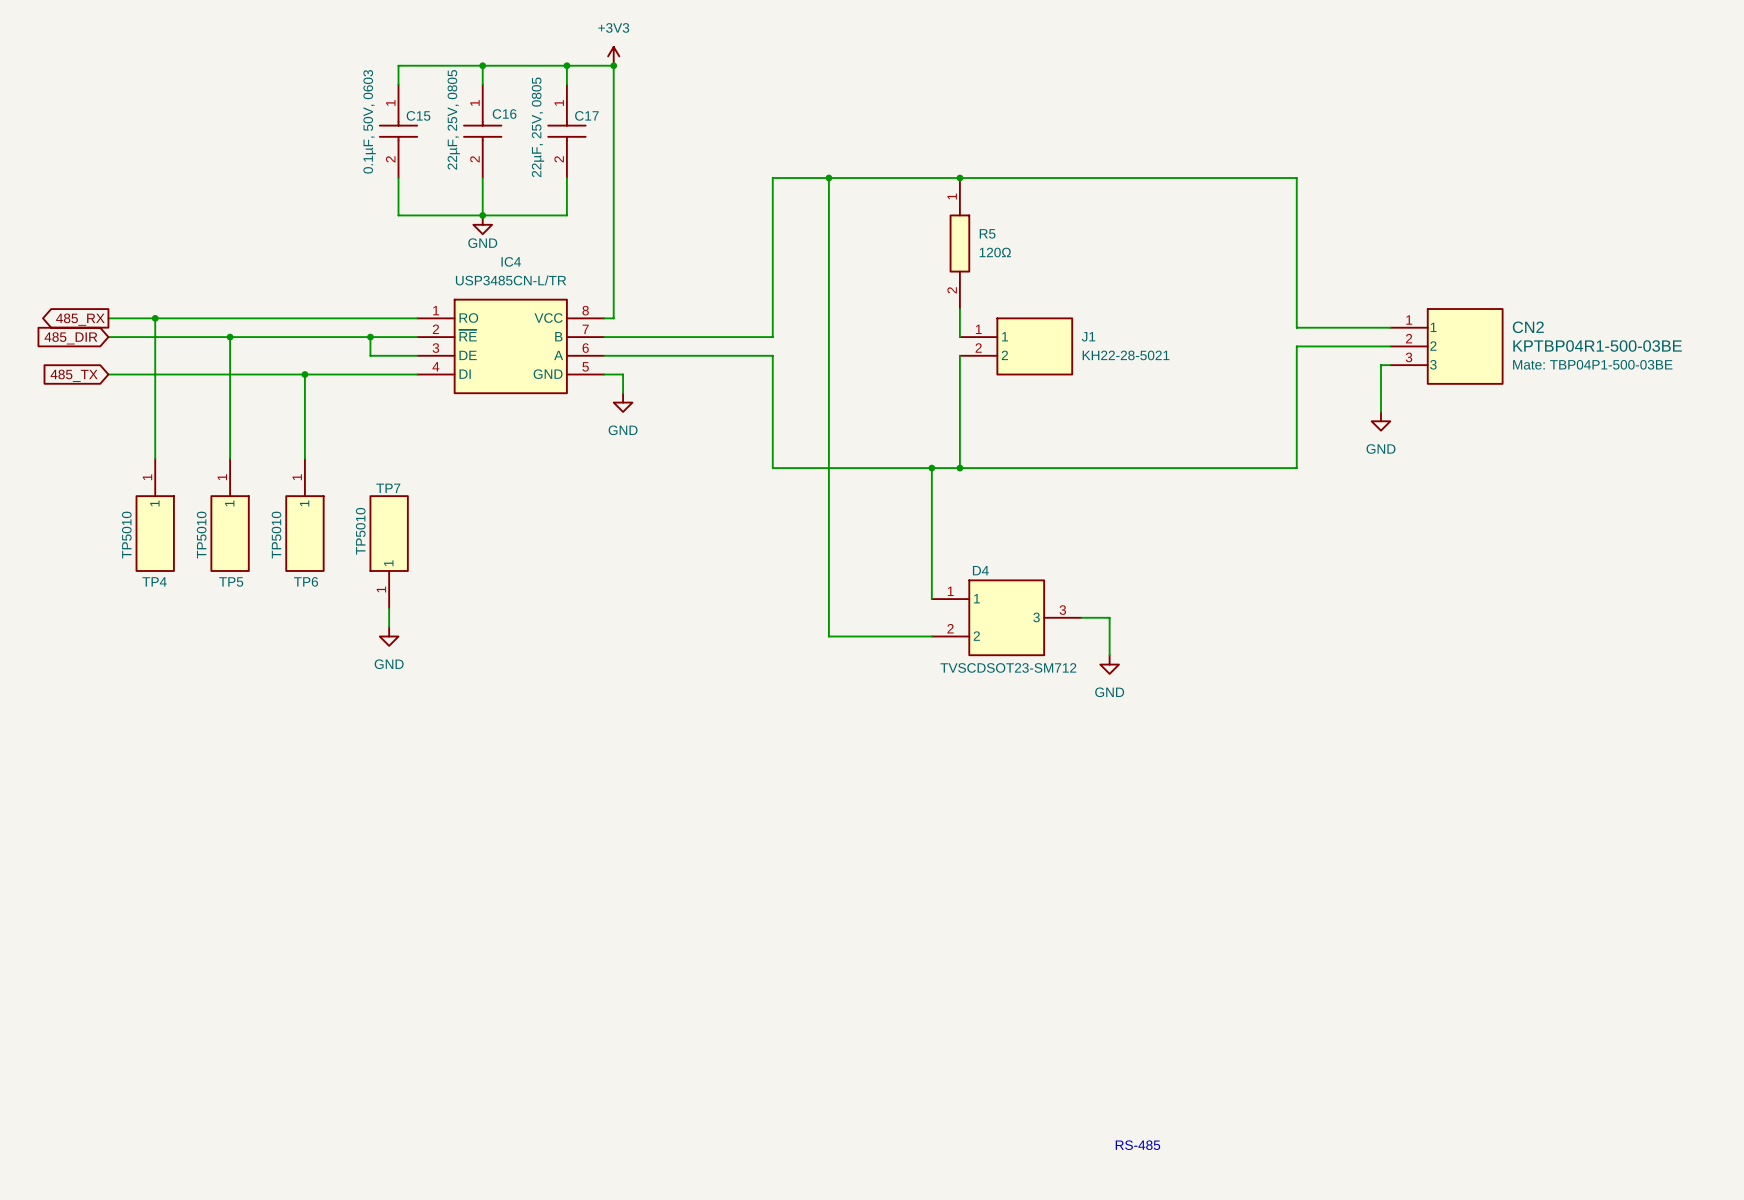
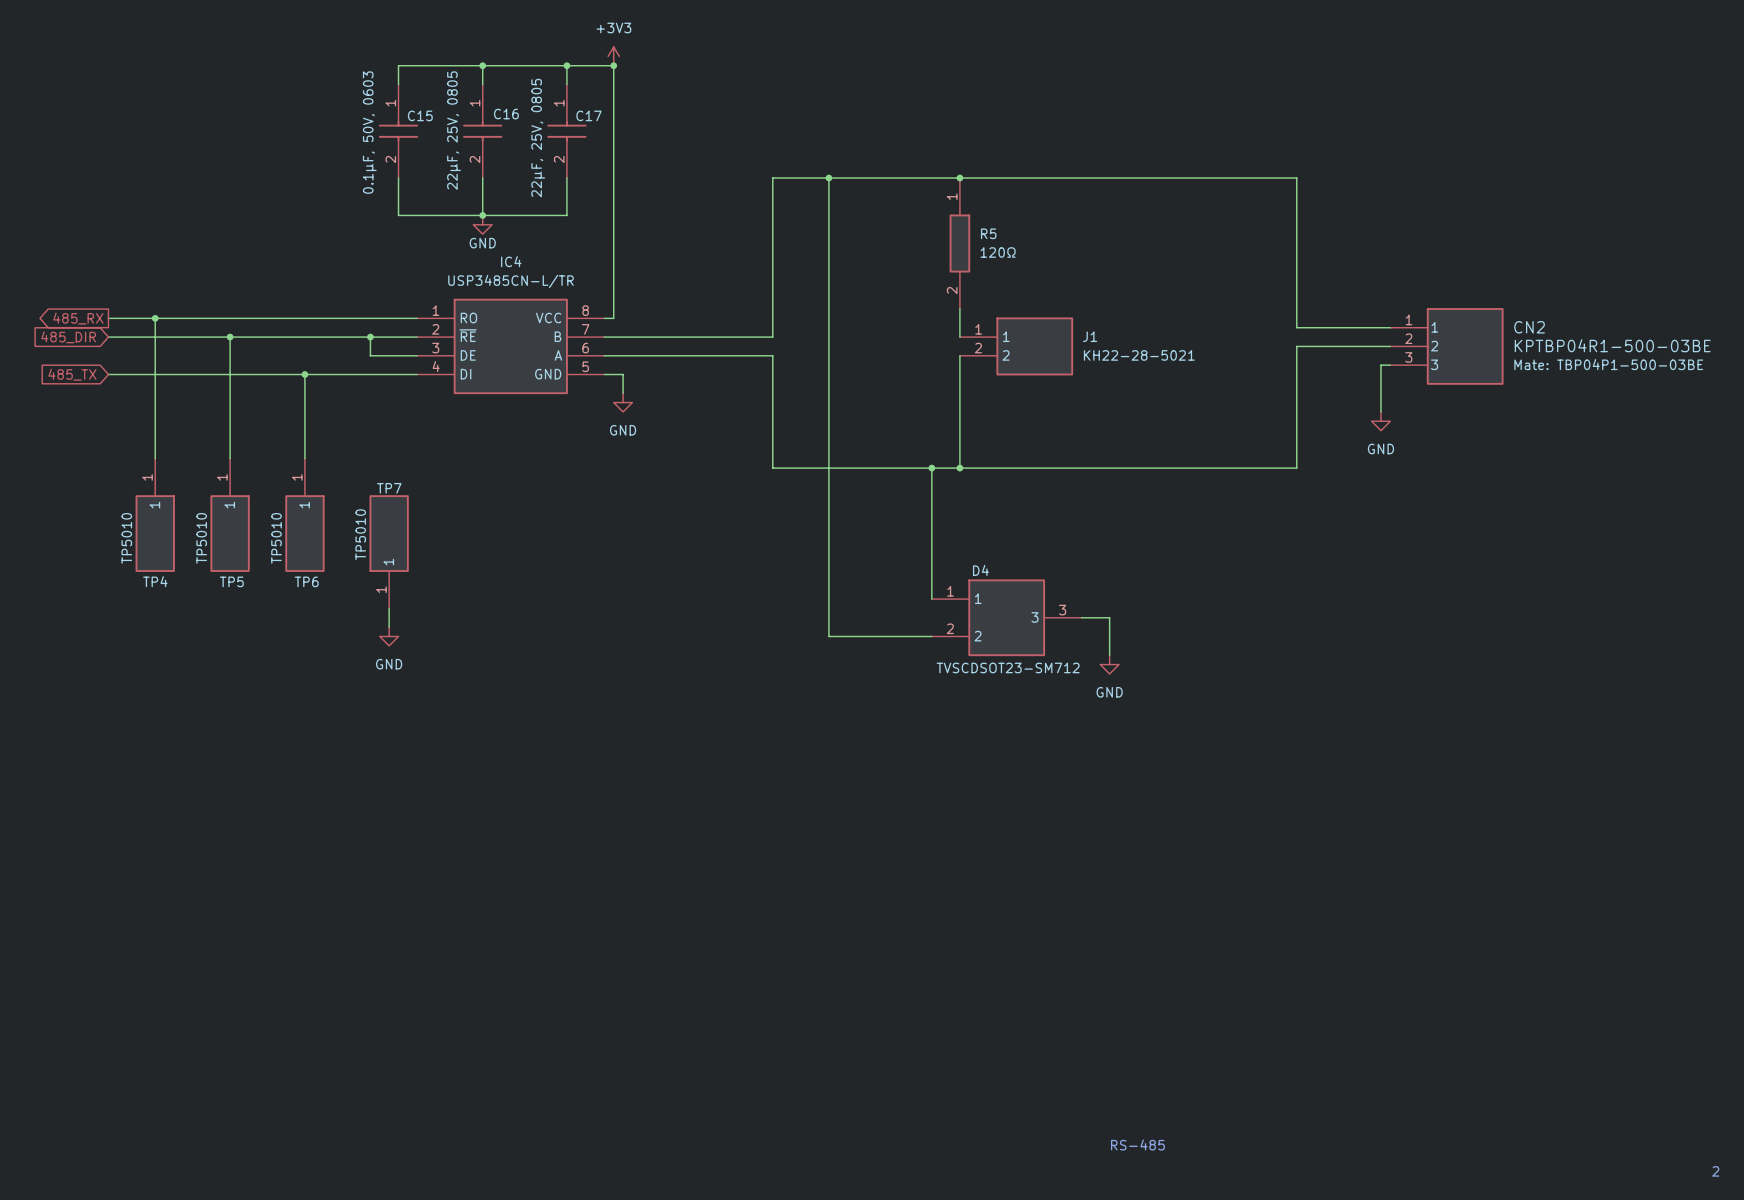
text: none -> 2 (1715, 1171)

